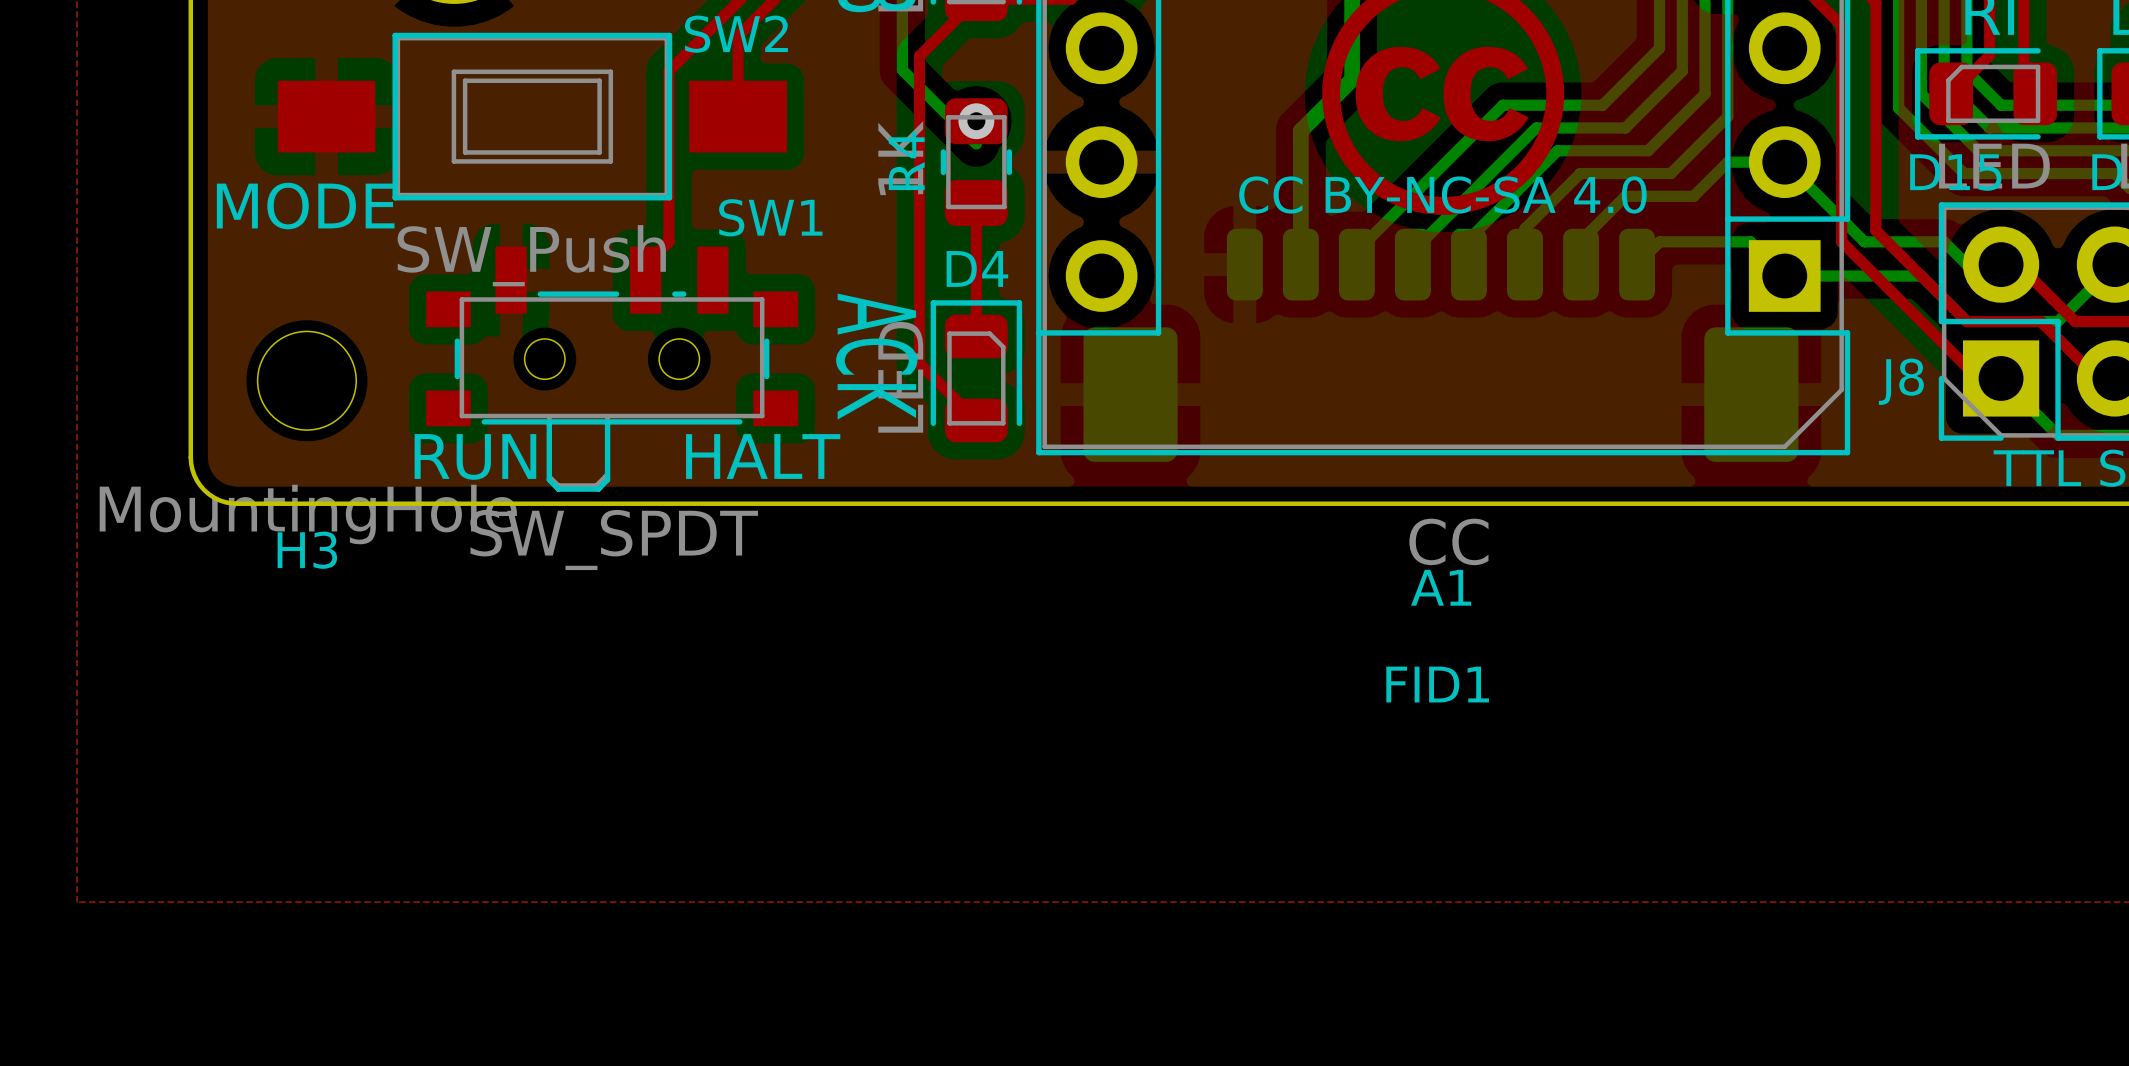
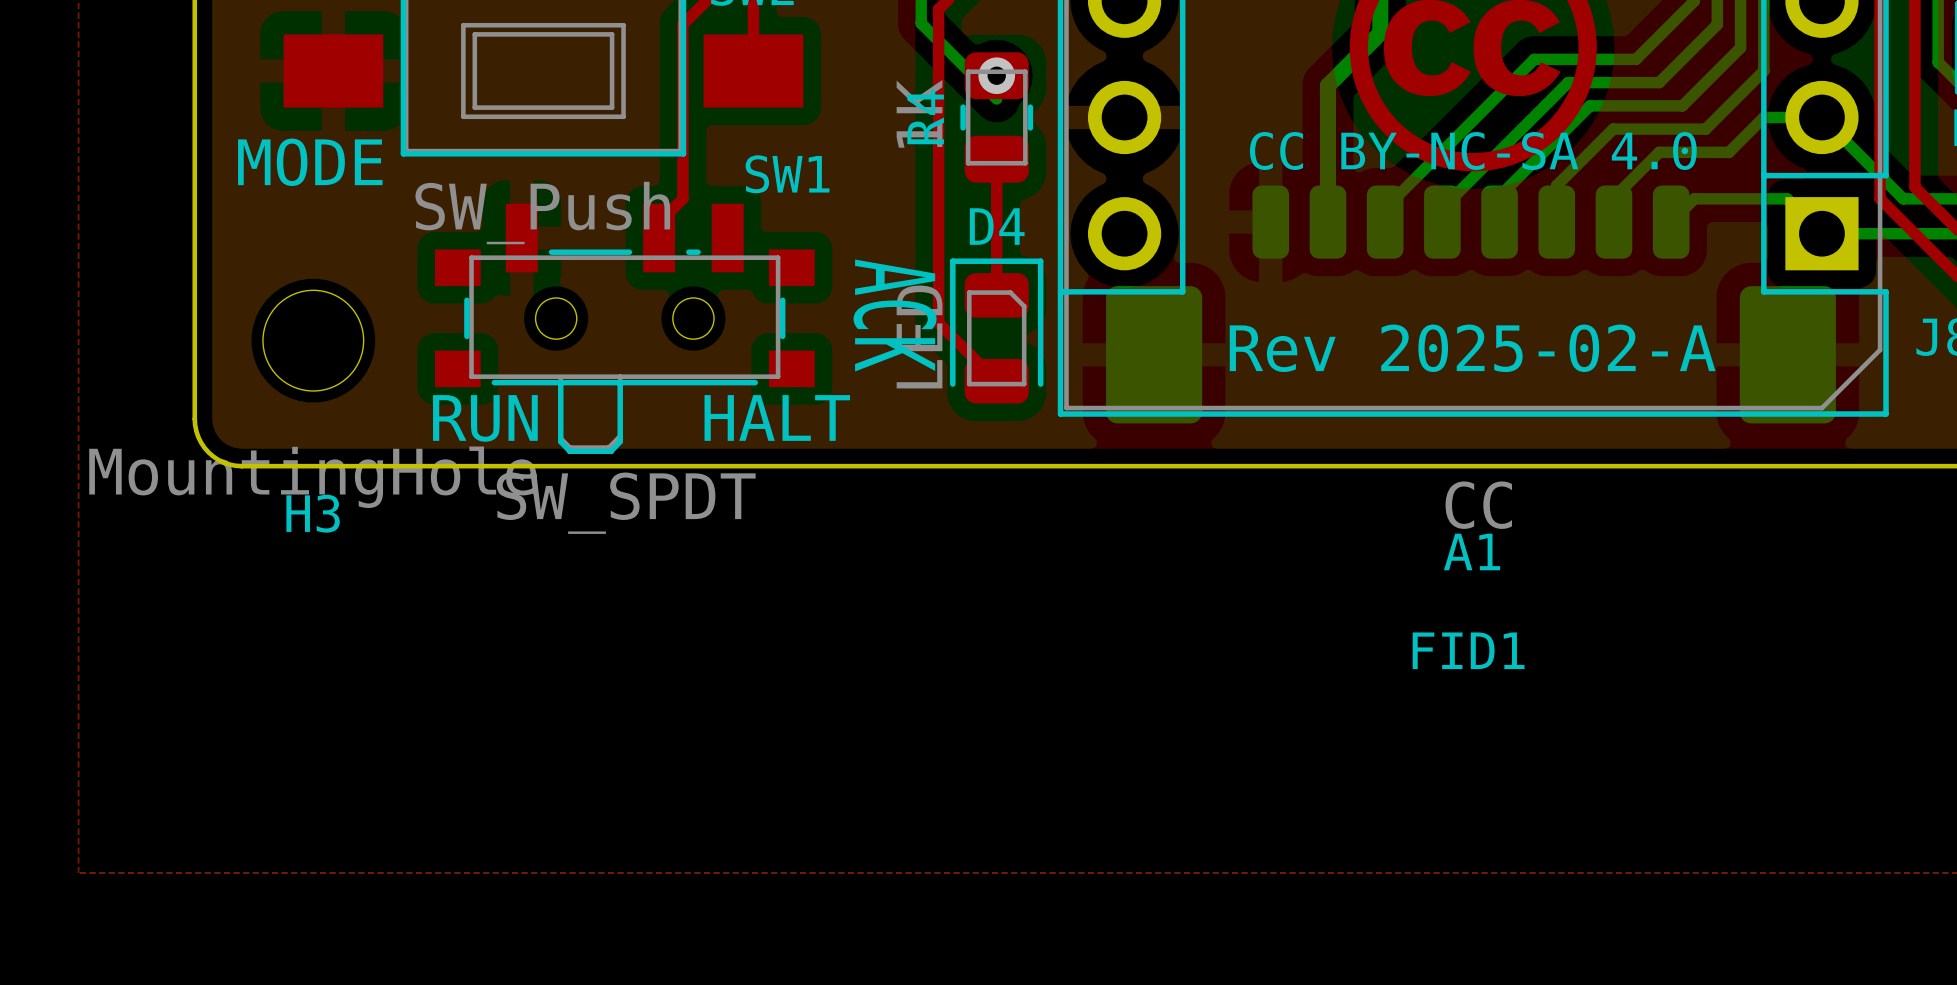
text: none -> Rev 2025-02-A (1472, 348)

